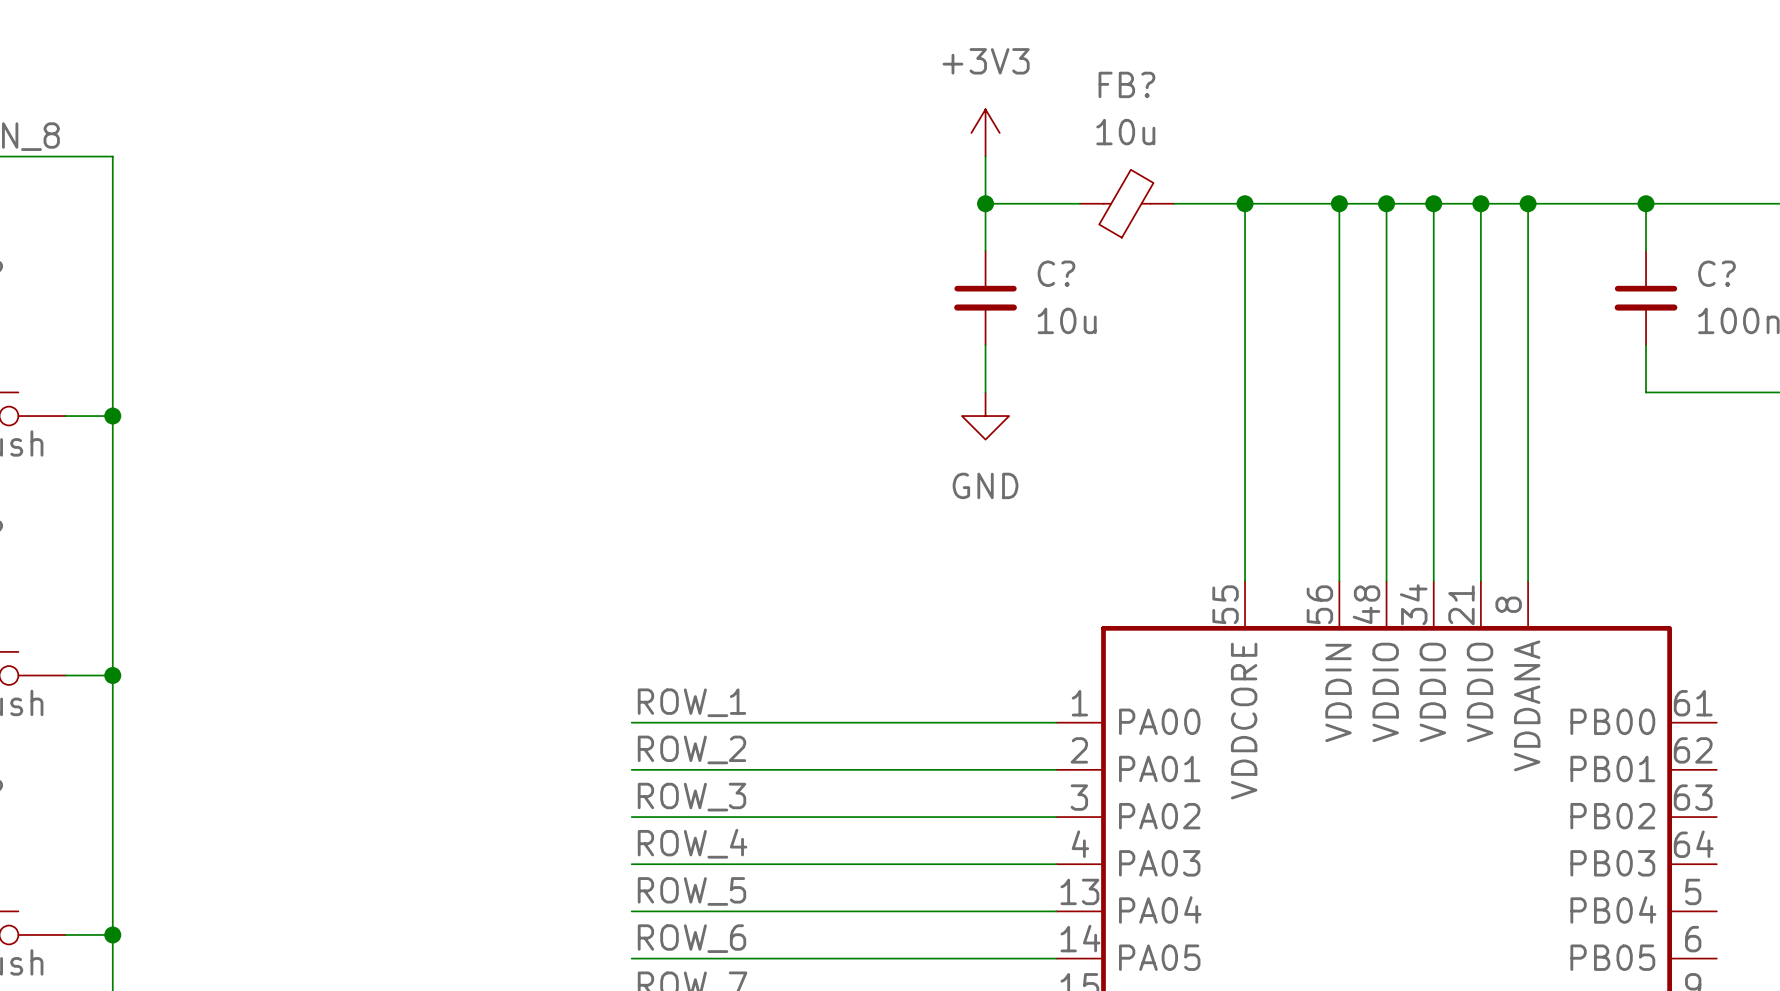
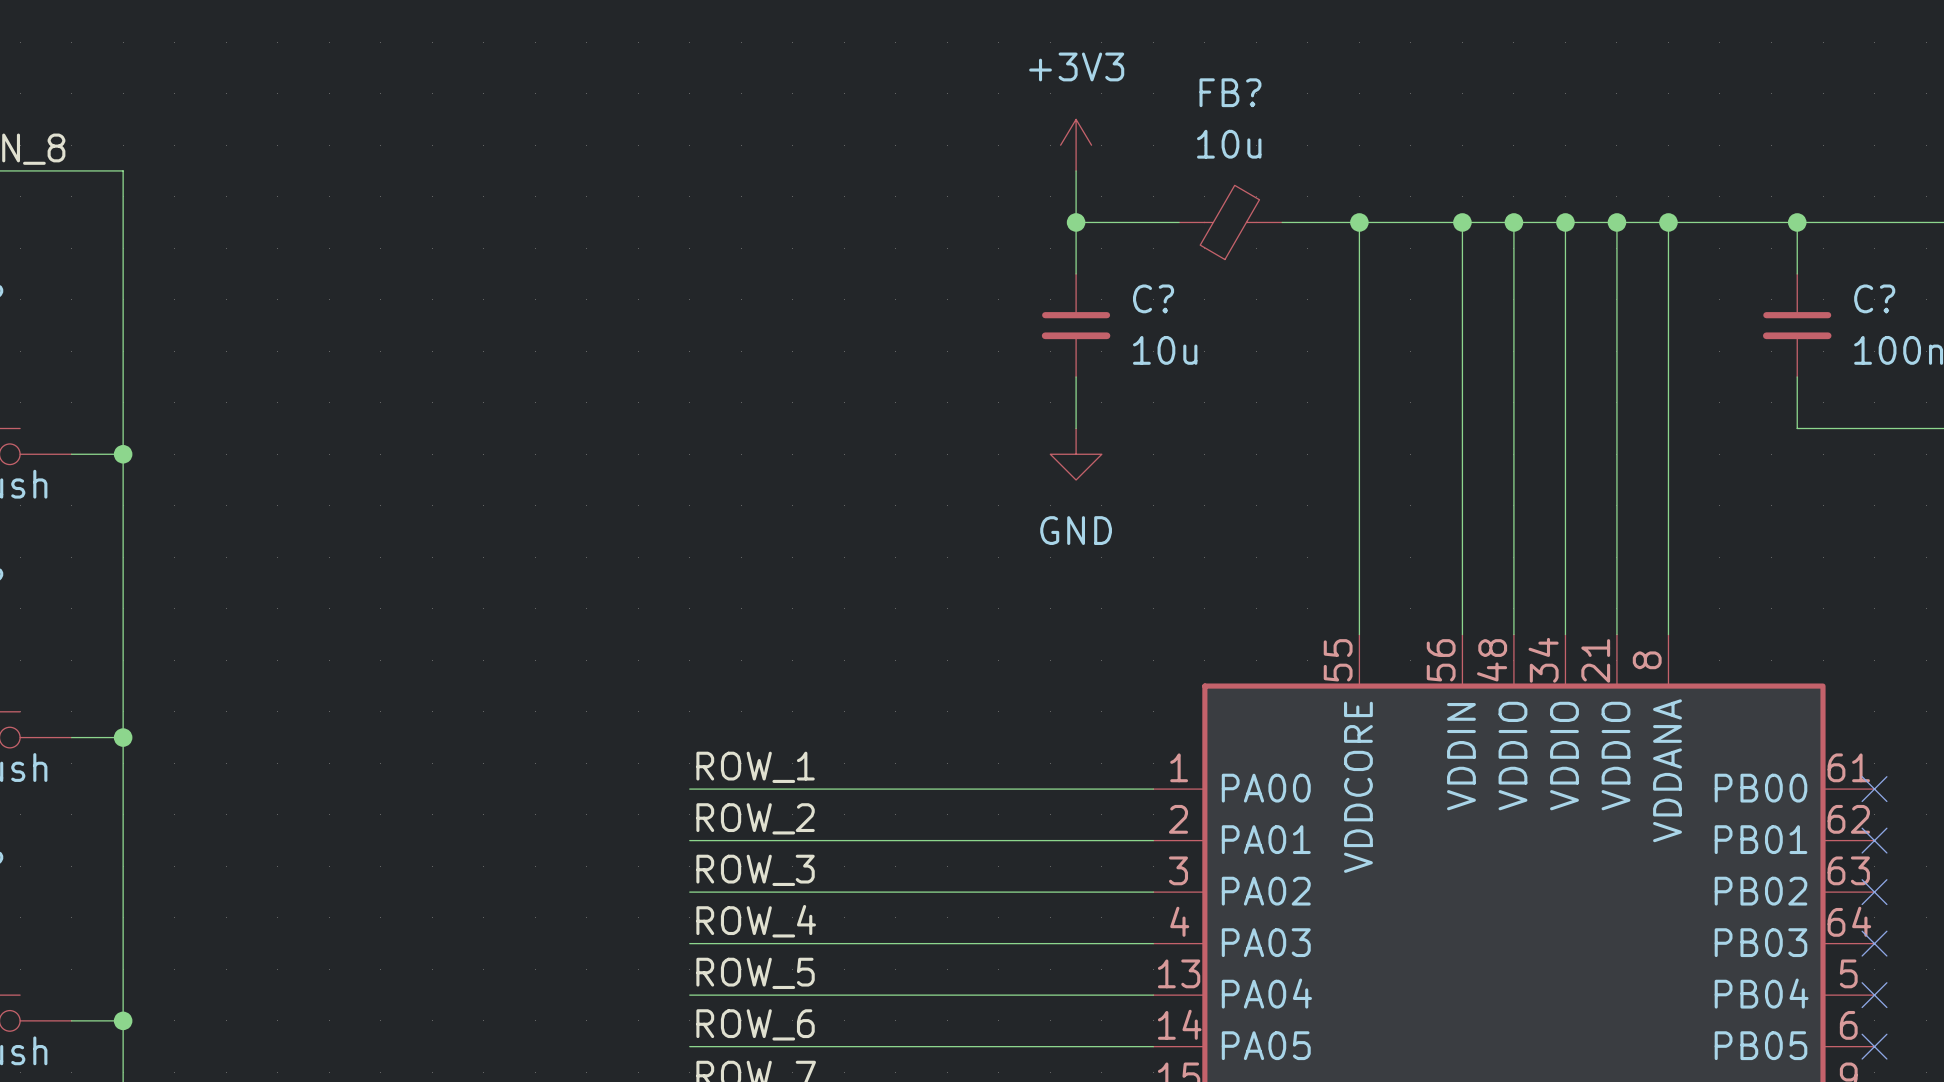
no-connect mark: none -> (1874, 789)
no-connect mark: none -> (1874, 840)
no-connect mark: none -> (1874, 892)
no-connect mark: none -> (1874, 943)
no-connect mark: none -> (1874, 995)
no-connect mark: none -> (1874, 1046)

